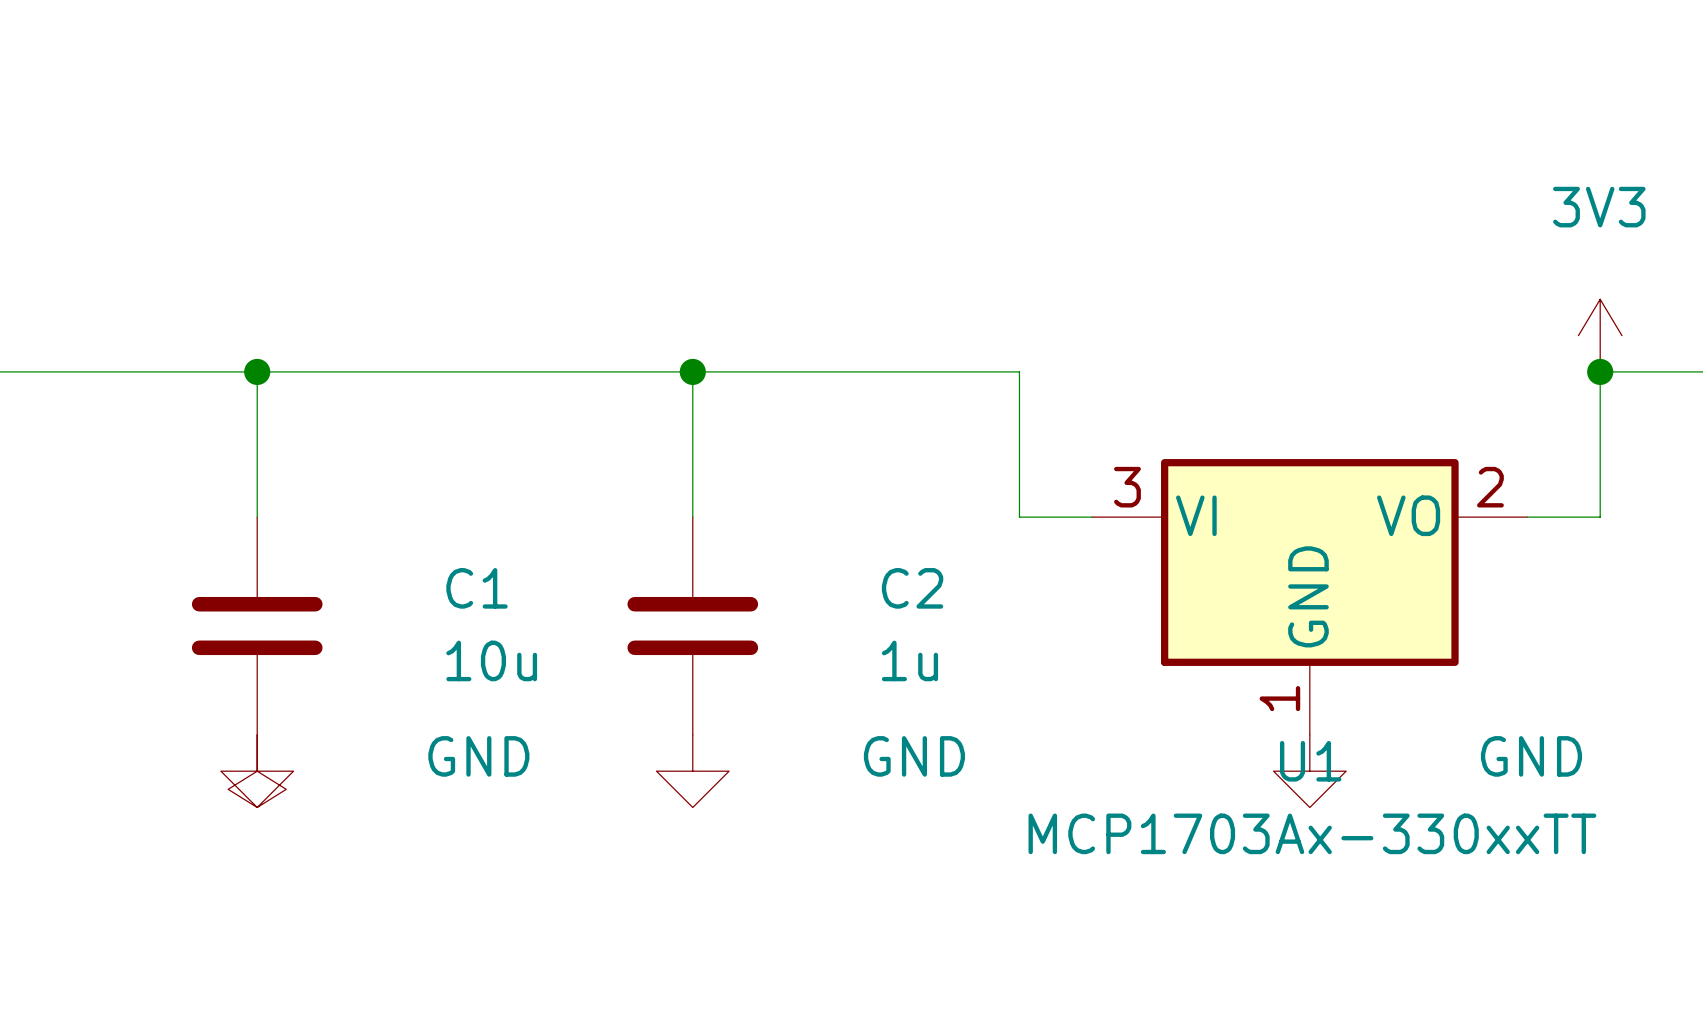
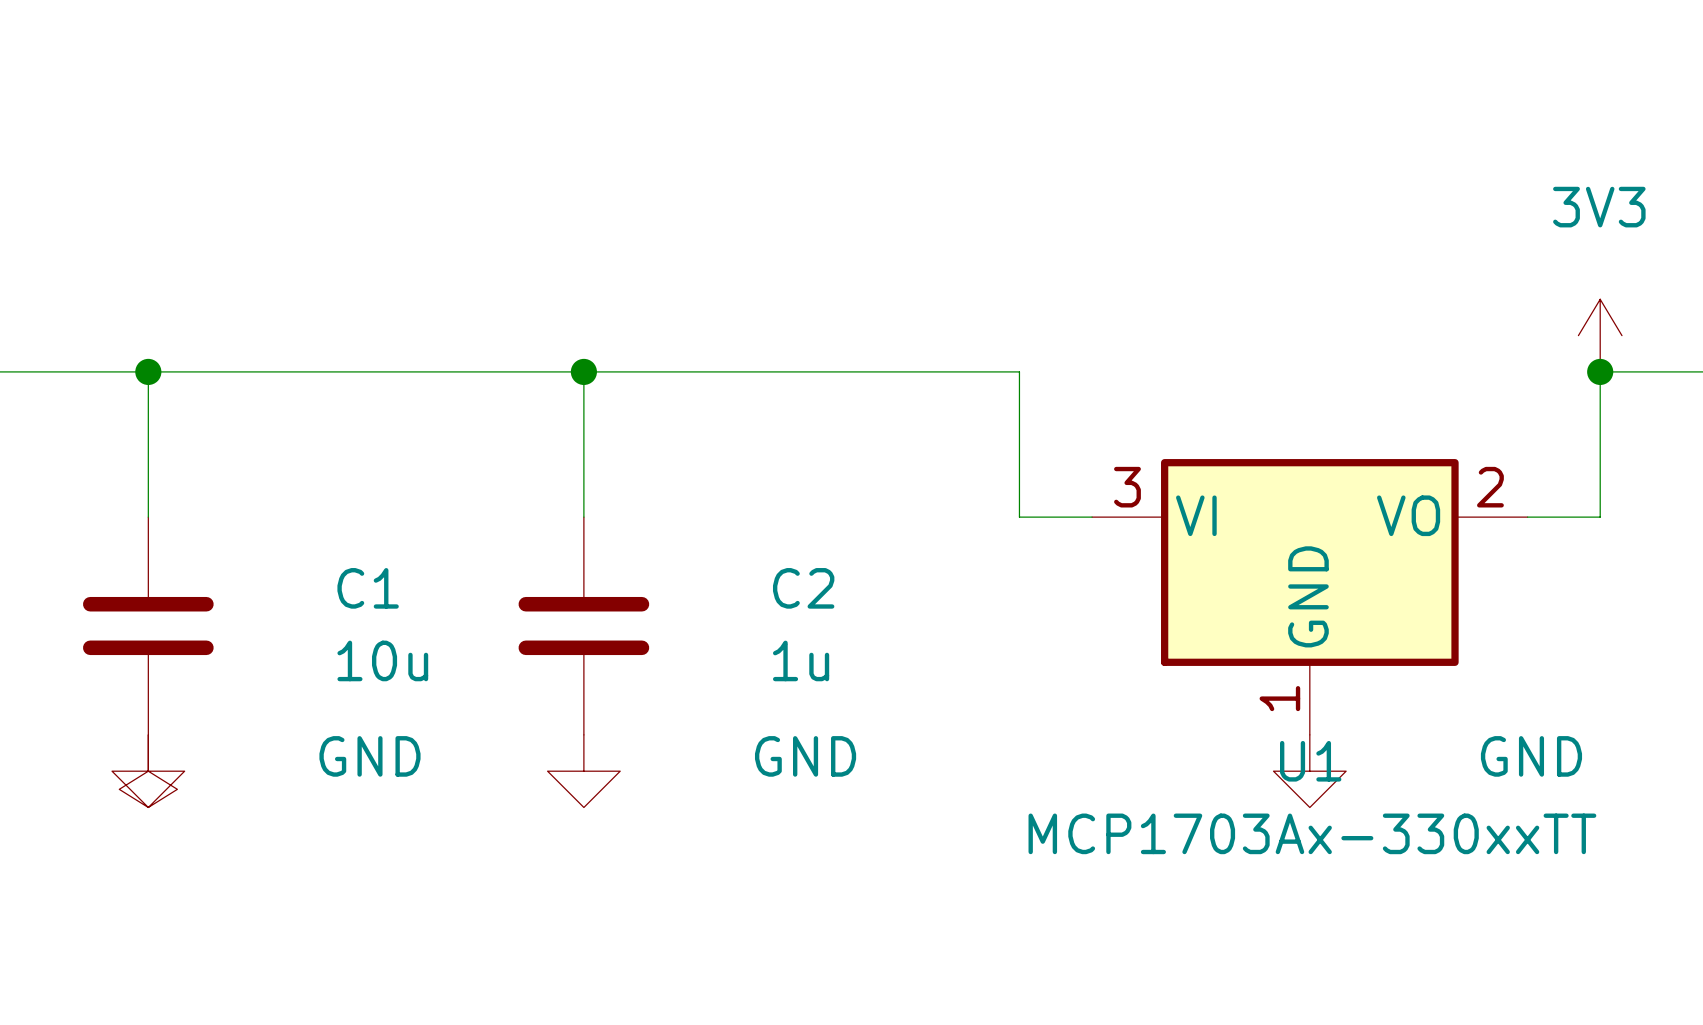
wire: (257, 371) (257, 517) -> (148, 371) (148, 517)
junction position: (257, 371) -> (148, 371)
wire: (692, 371) (692, 517) -> (583, 371) (583, 517)
junction position: (692, 371) -> (583, 371)
C1 position: (257, 626) -> (148, 626)
C2 position: (692, 626) -> (583, 626)
power symbol position: (257, 771) -> (148, 771)
power symbol position: GND (257, 771) -> GND (148, 771)
power symbol position: GND (692, 771) -> GND (583, 771)

